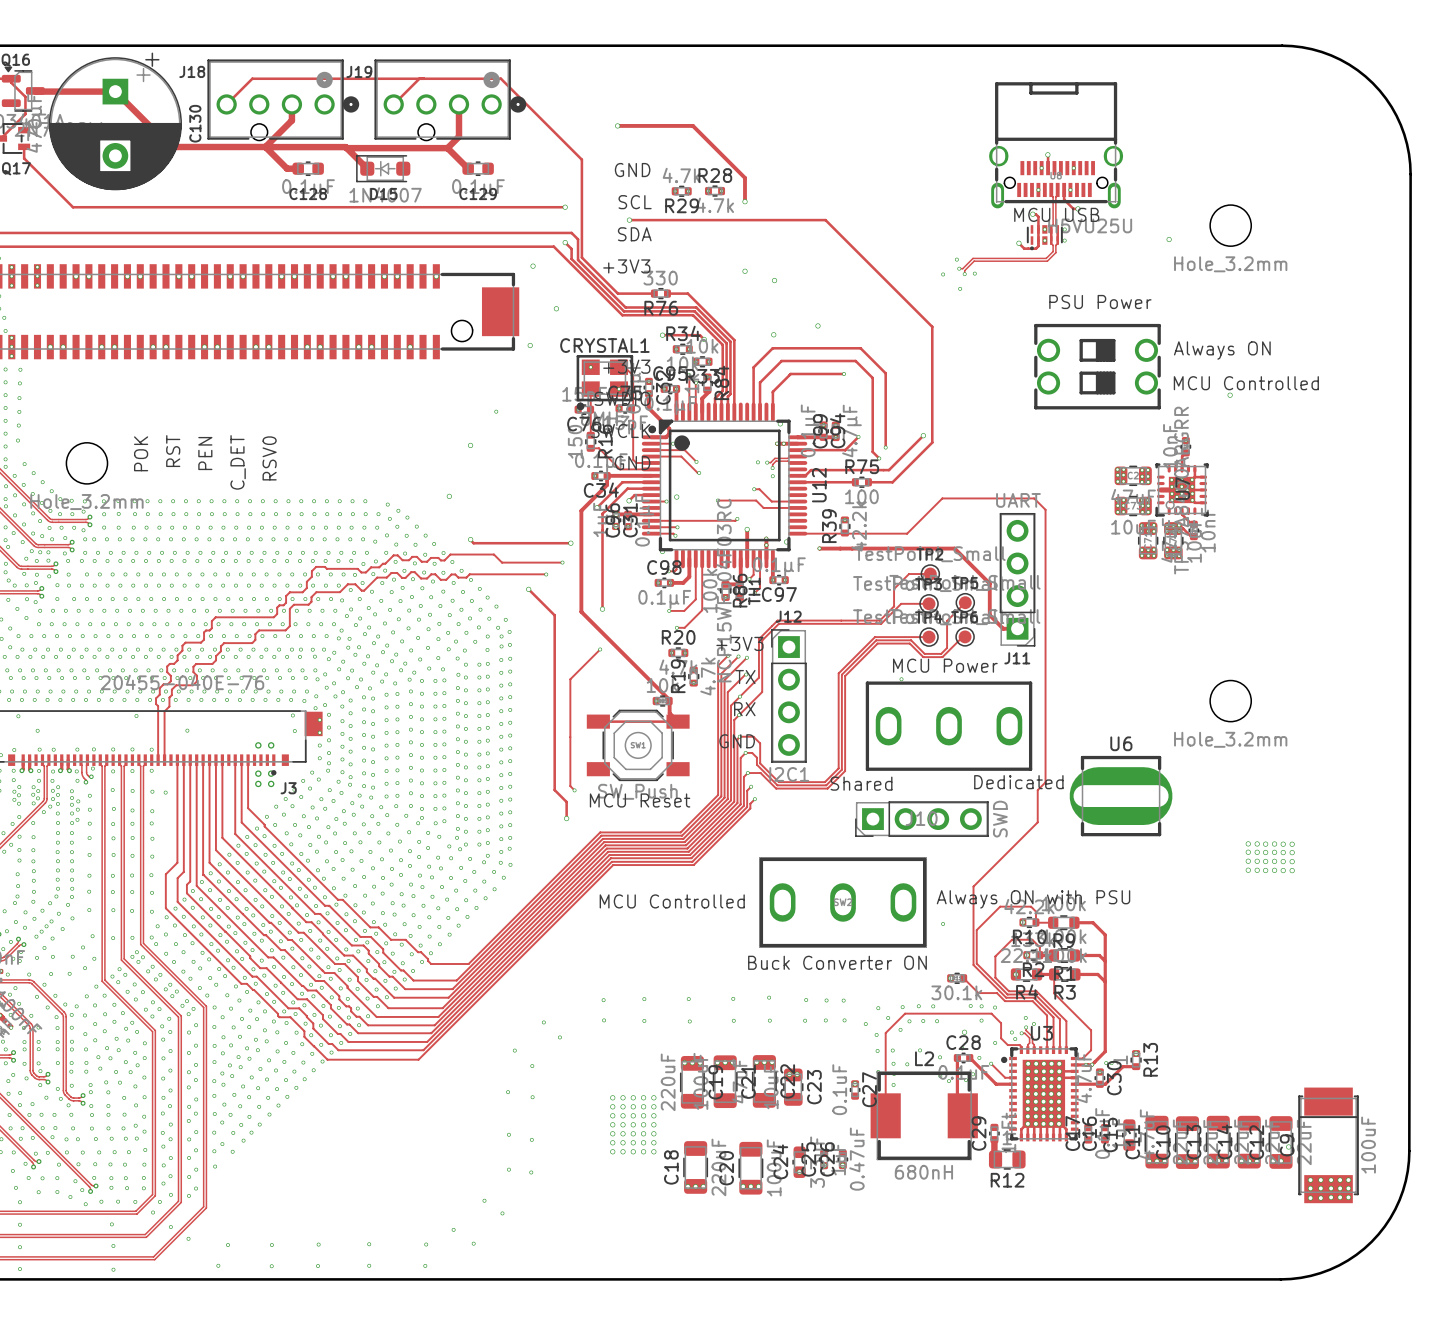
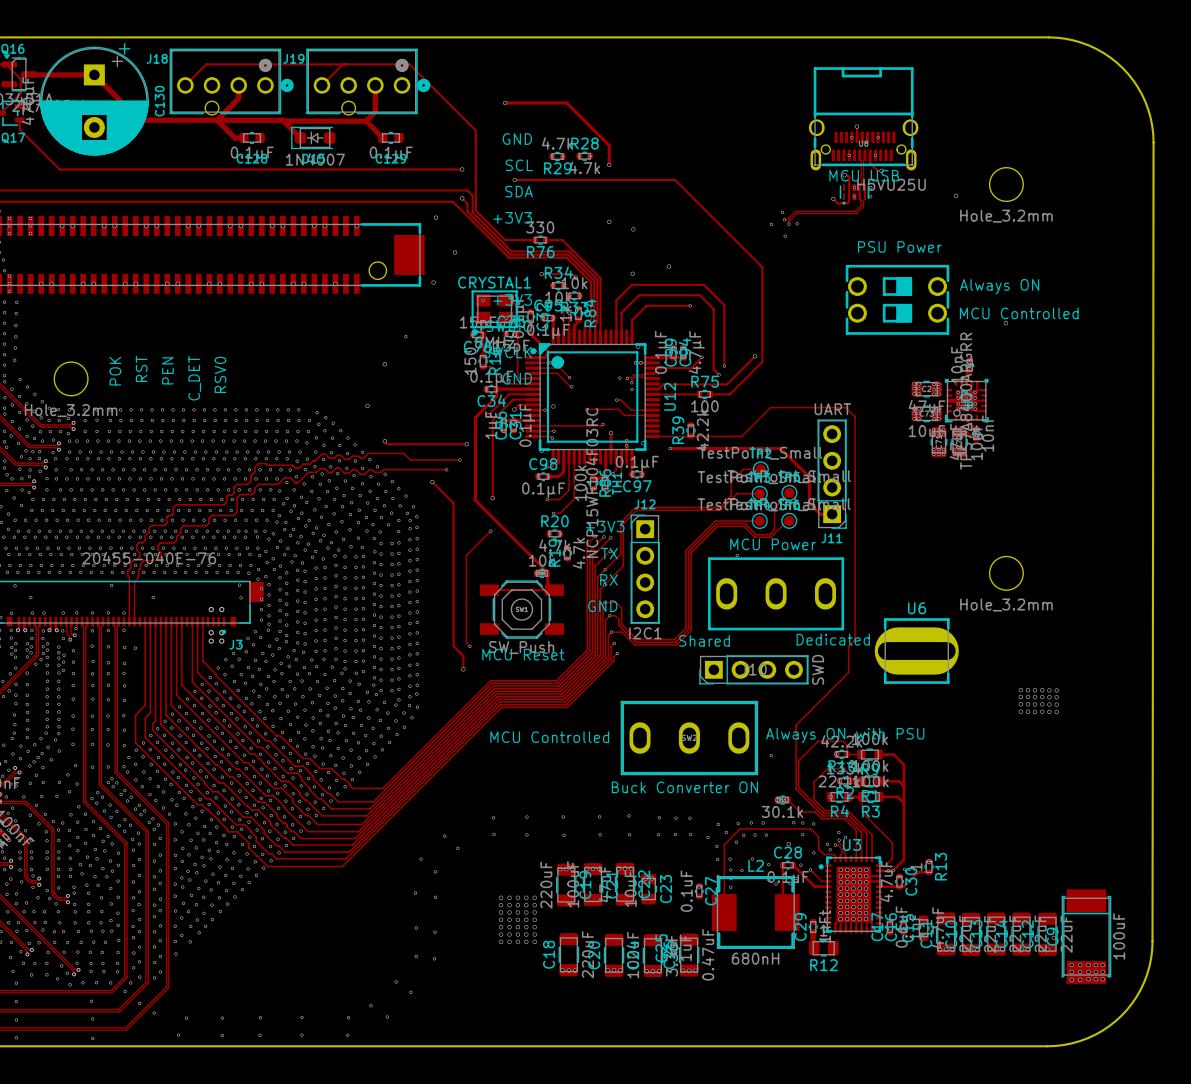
C24 footprint: [792, 1146, 807, 1178] -> [642, 934, 664, 978]
C26 footprint: [837, 1149, 849, 1170] -> [679, 933, 700, 977]
via: (842, 1165) -> none
via: (799, 1172) -> none
via: none -> (646, 971)
via: none -> (652, 971)
via: none -> (659, 971)
via: none -> (682, 970)
via: none -> (689, 970)
via: none -> (695, 970)

